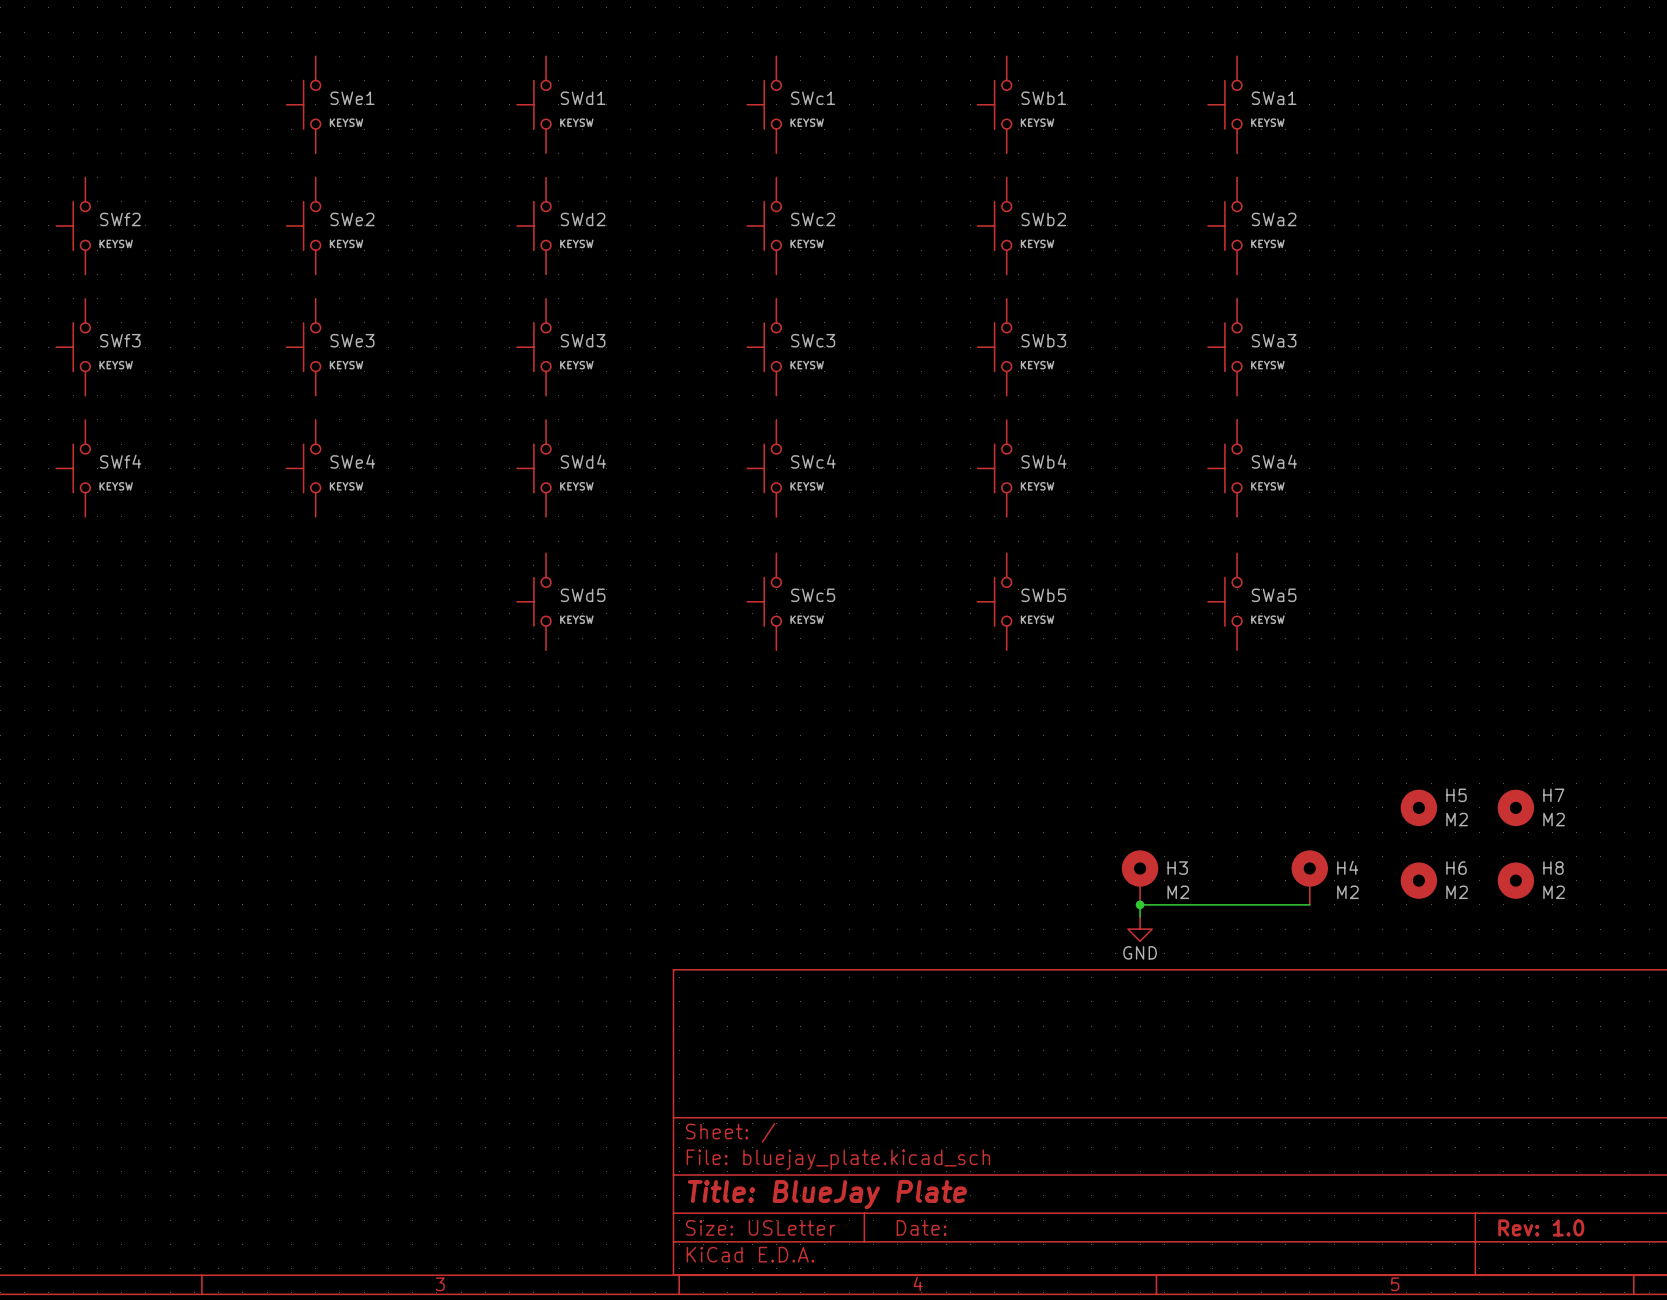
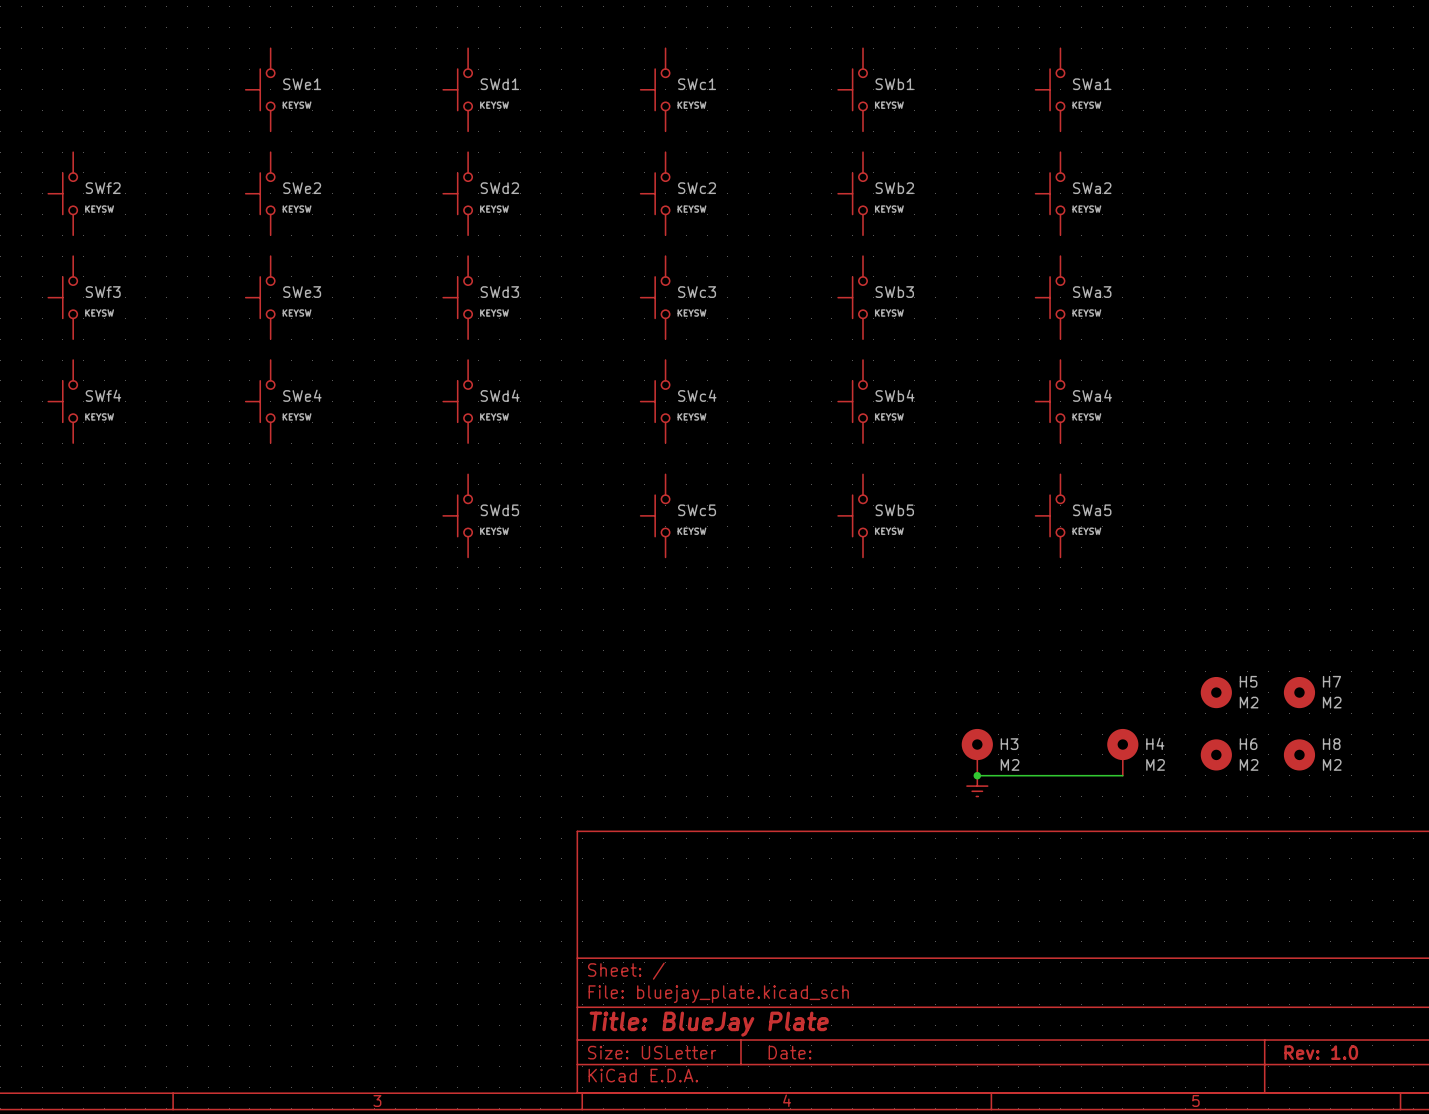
power symbol: none -> (977, 786)
power symbol: GND (1140, 929) -> none

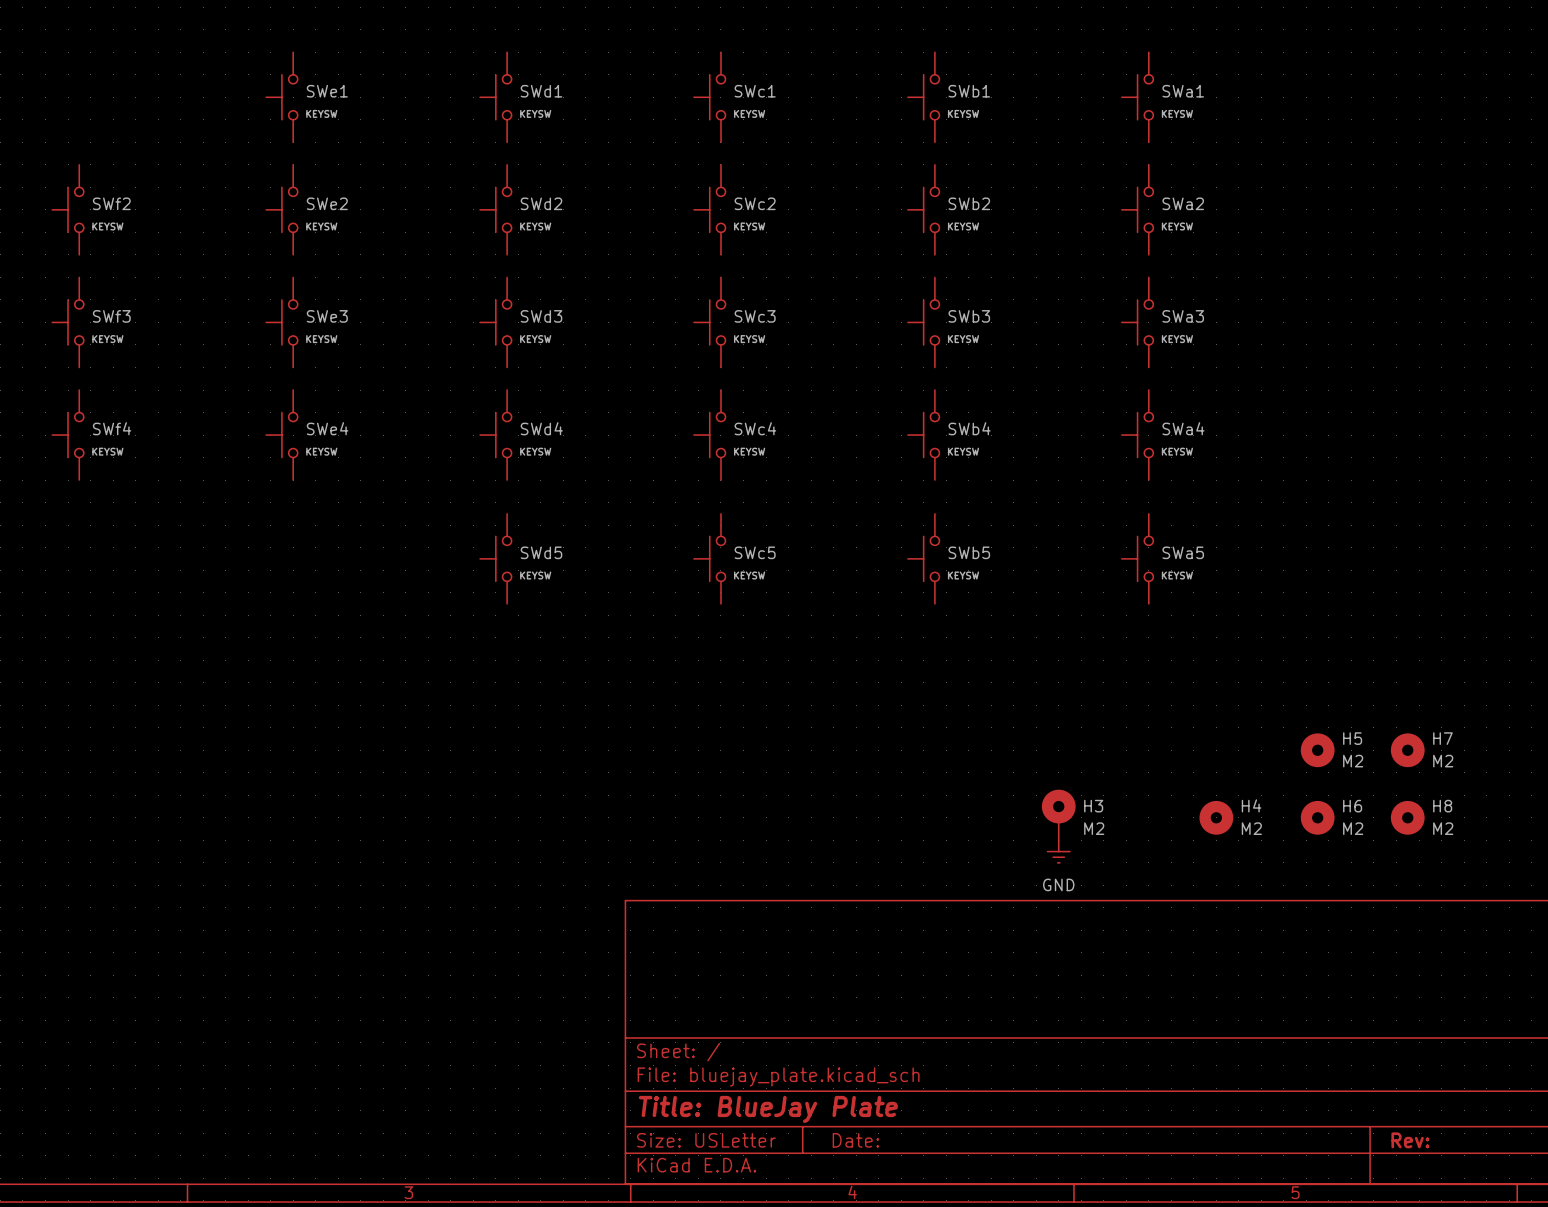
H4 symbol: [1107, 728, 1139, 776] -> [1199, 800, 1234, 835]
wire: (977, 775) (1122, 775) -> none
junction: (977, 775) -> none
power symbol text: none -> GND (1058, 884)
title block: Rev: 1.0 (1321, 1052) -> Rev: (1410, 1140)

